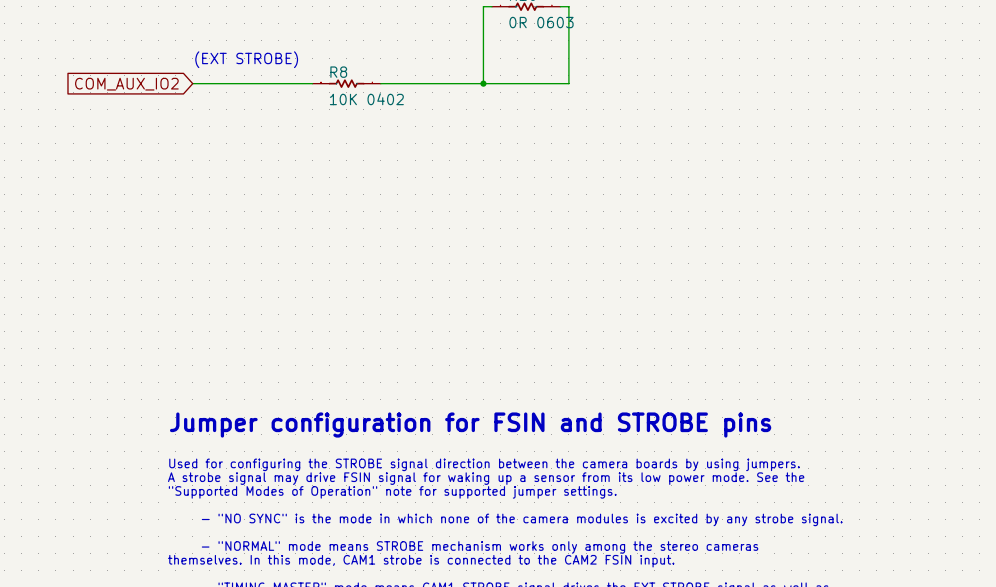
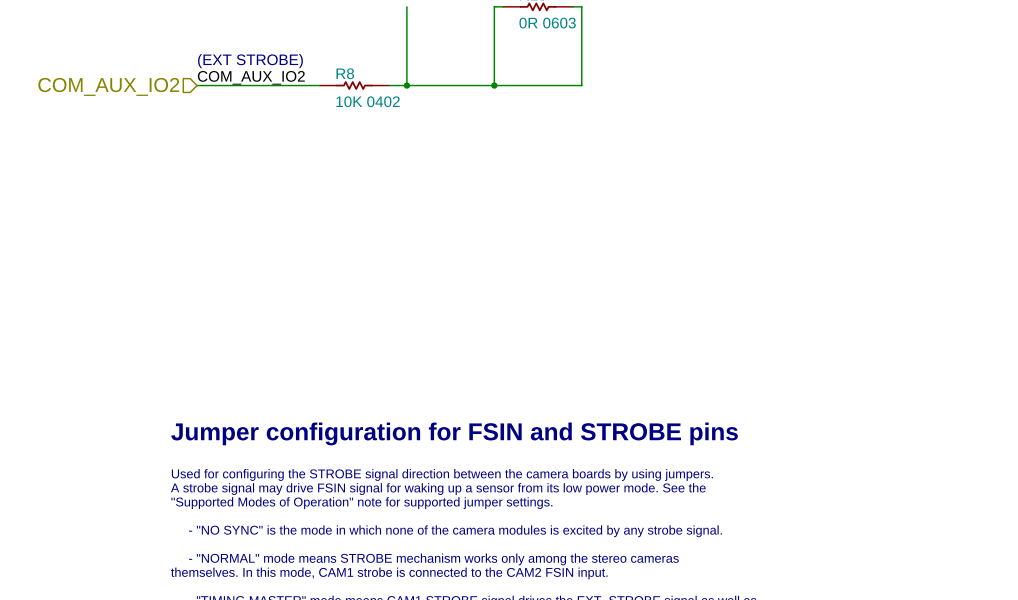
wire: none -> (406, 6) (406, 85)
label: none -> COM_AUX_IO2 (251, 77)
hierarchical label: none -> COM_AUX_IO2 (108, 86)
junction: none -> (406, 85)
global label: COM_AUX_IO2 (126, 84) -> none

